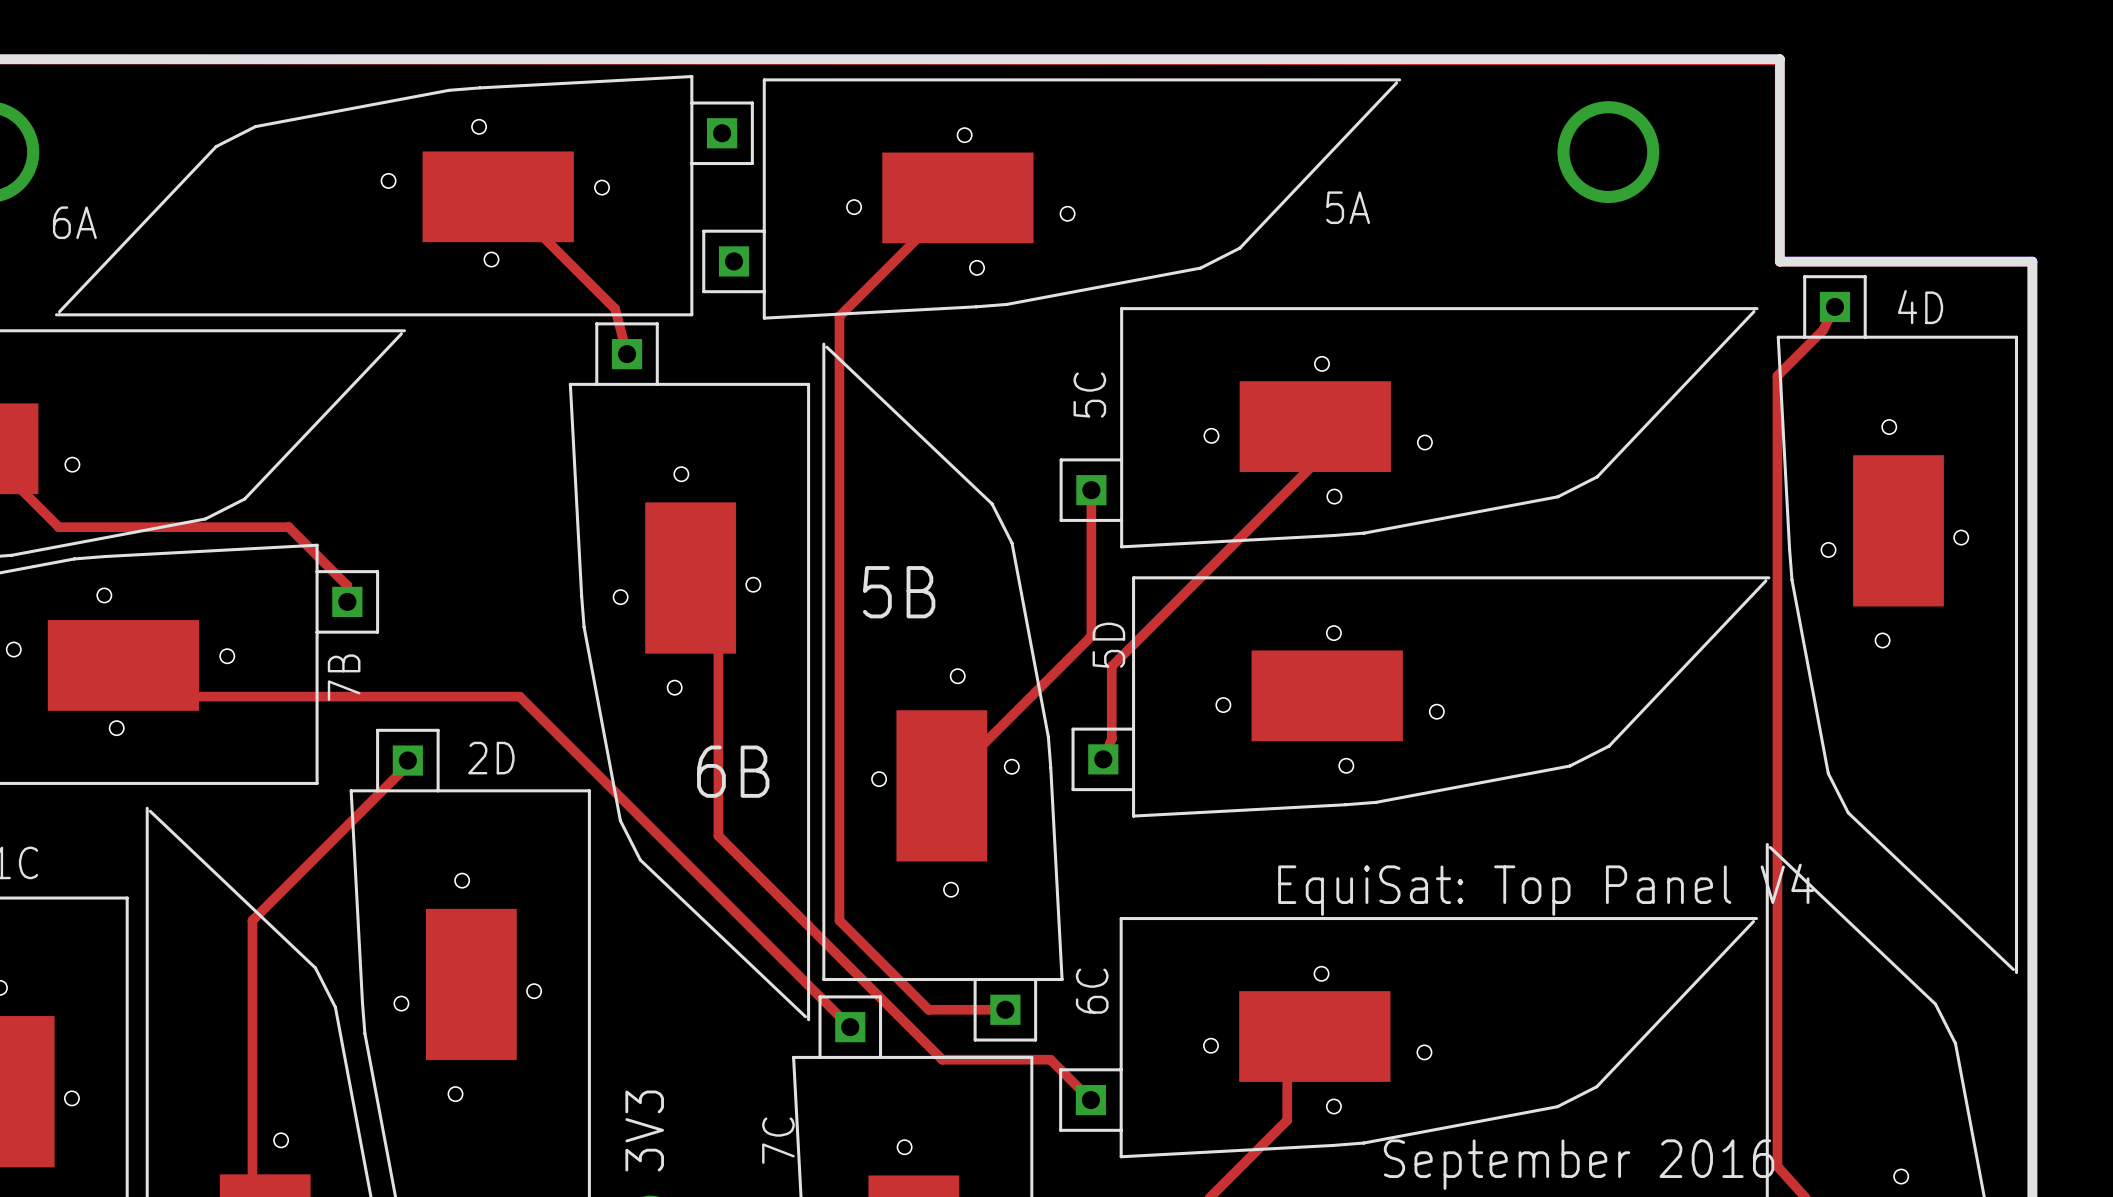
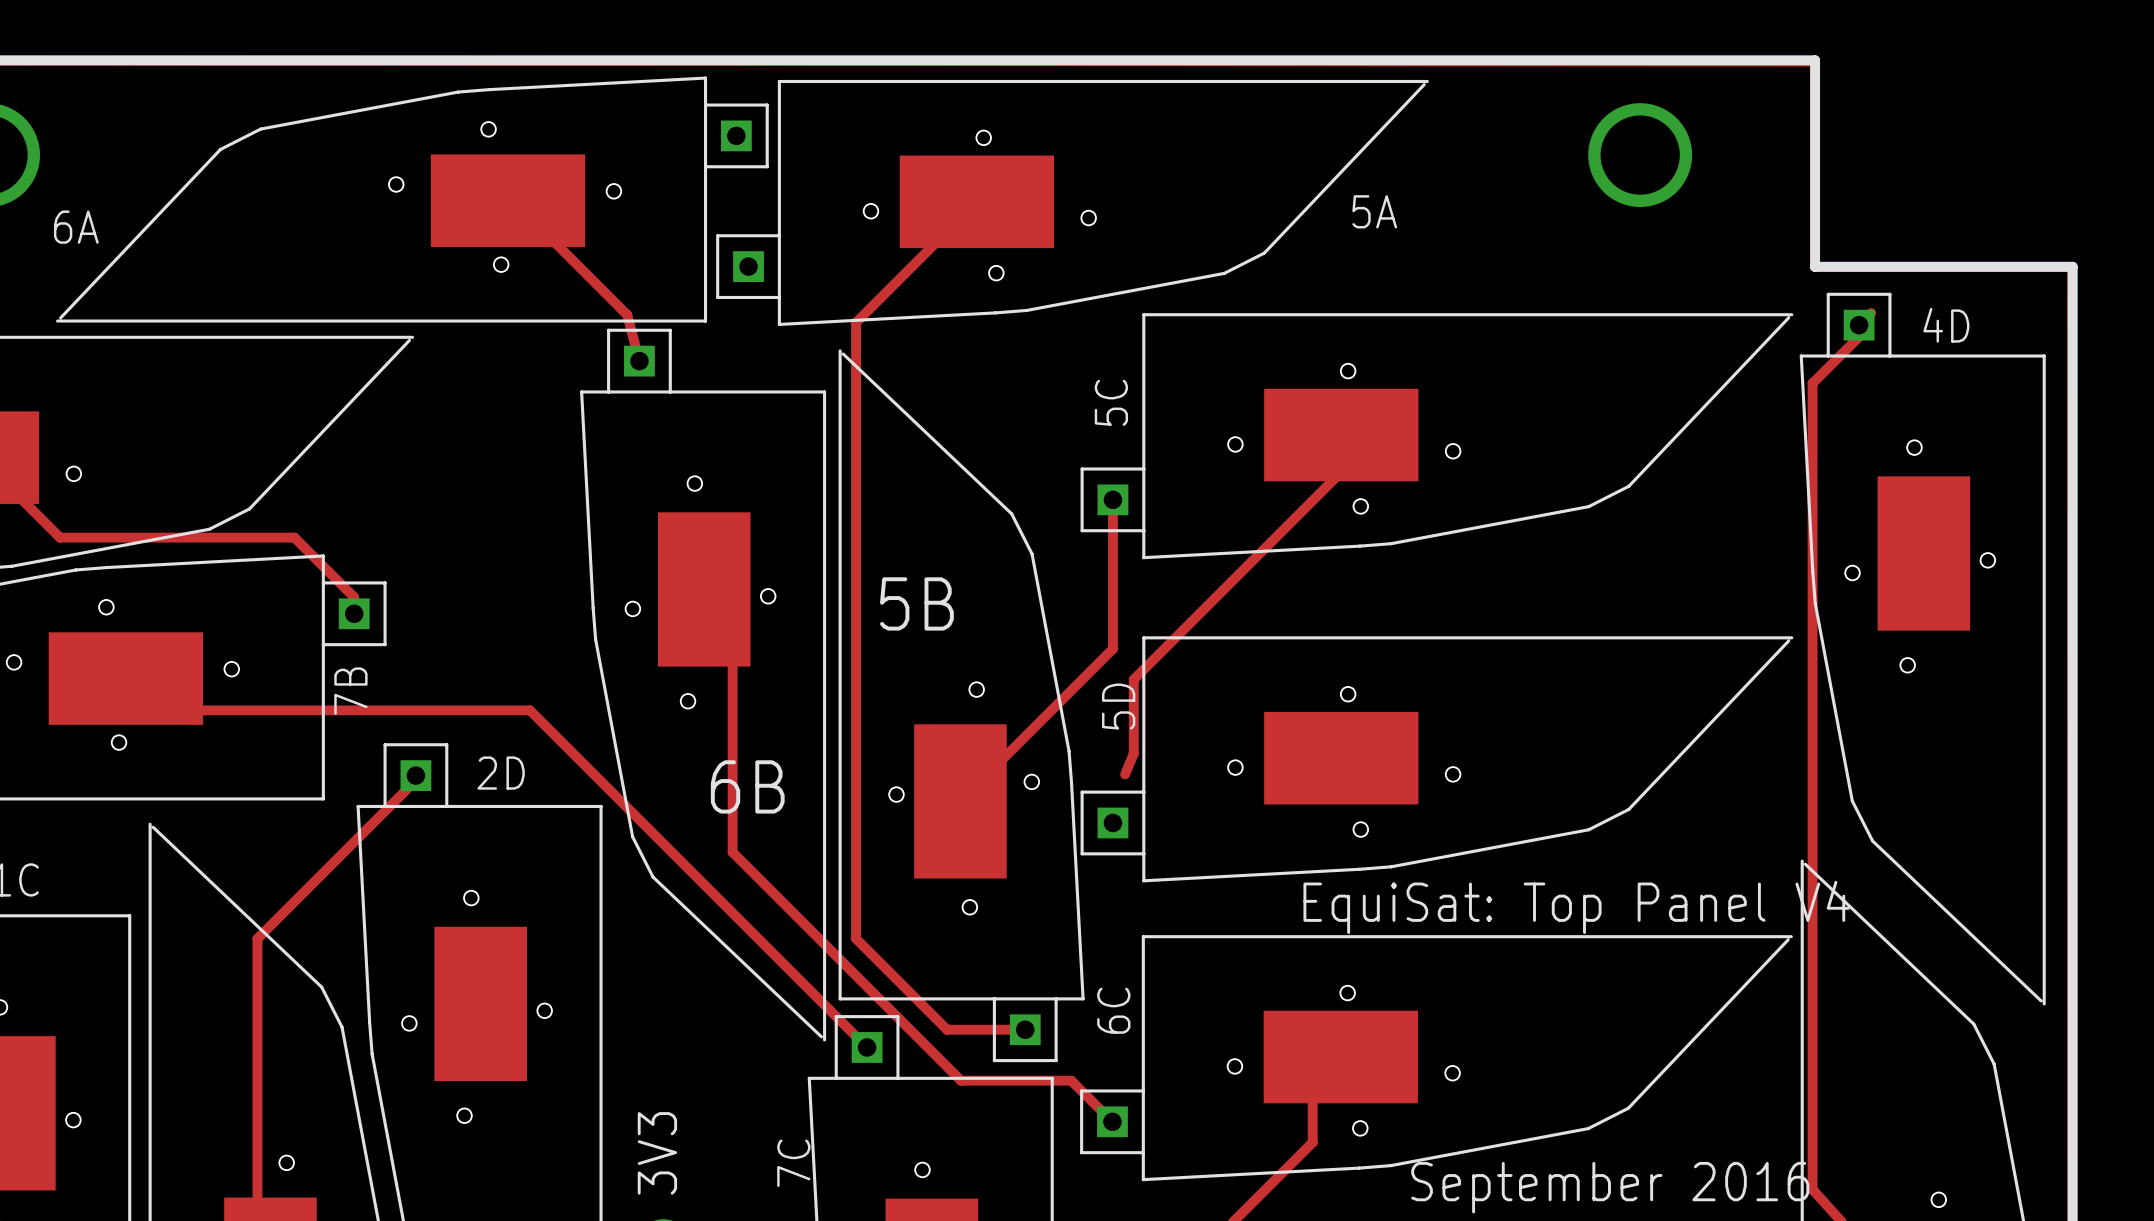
4D position: (1897, 624) -> (1922, 649)
5D position: (1421, 696) -> (1436, 759)

